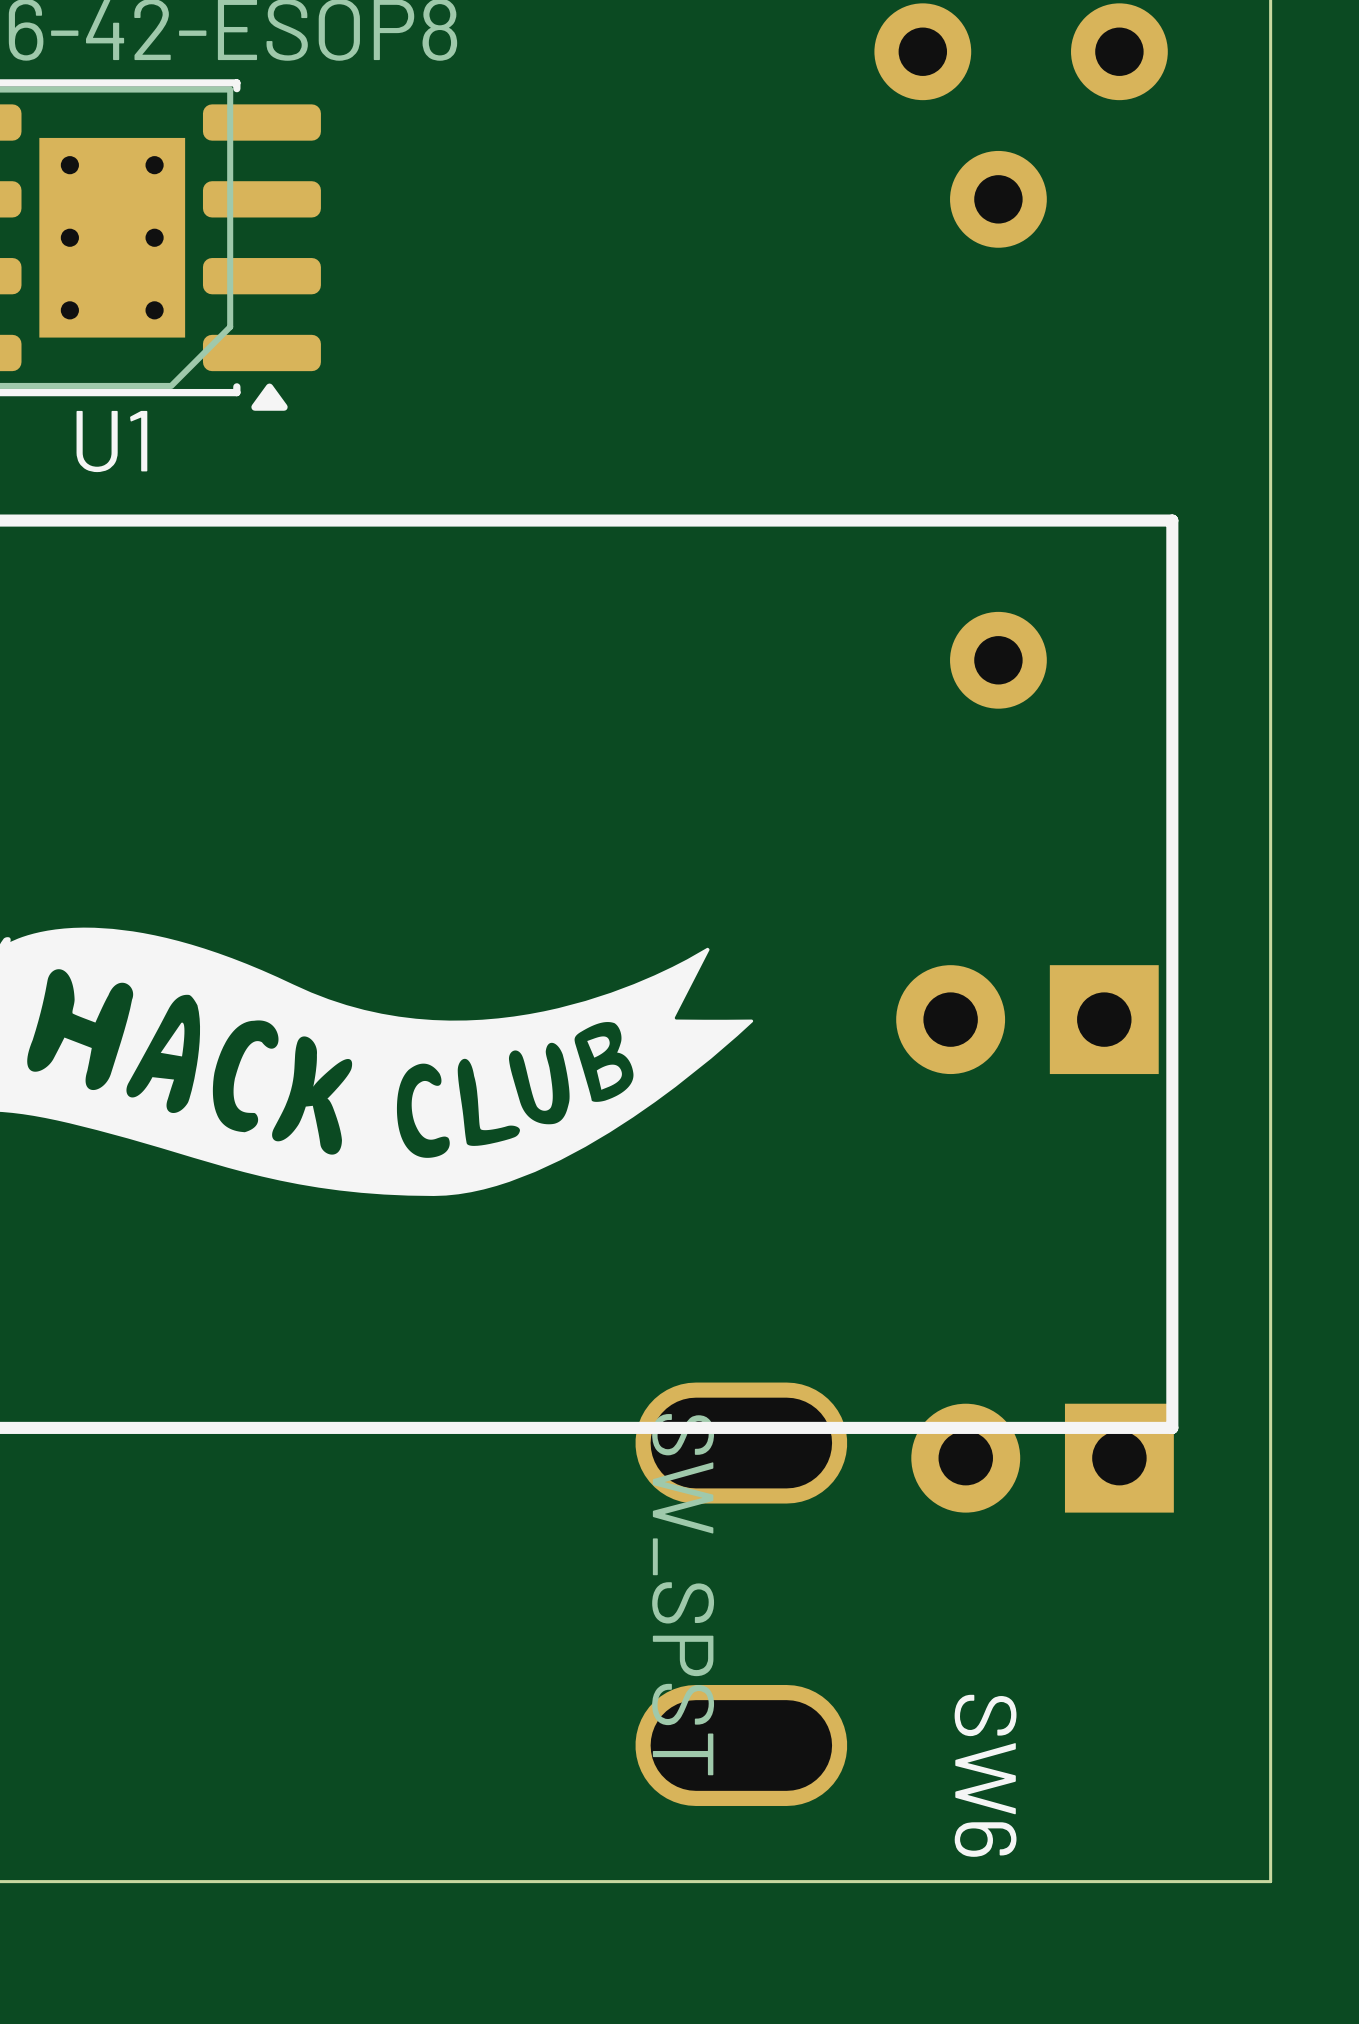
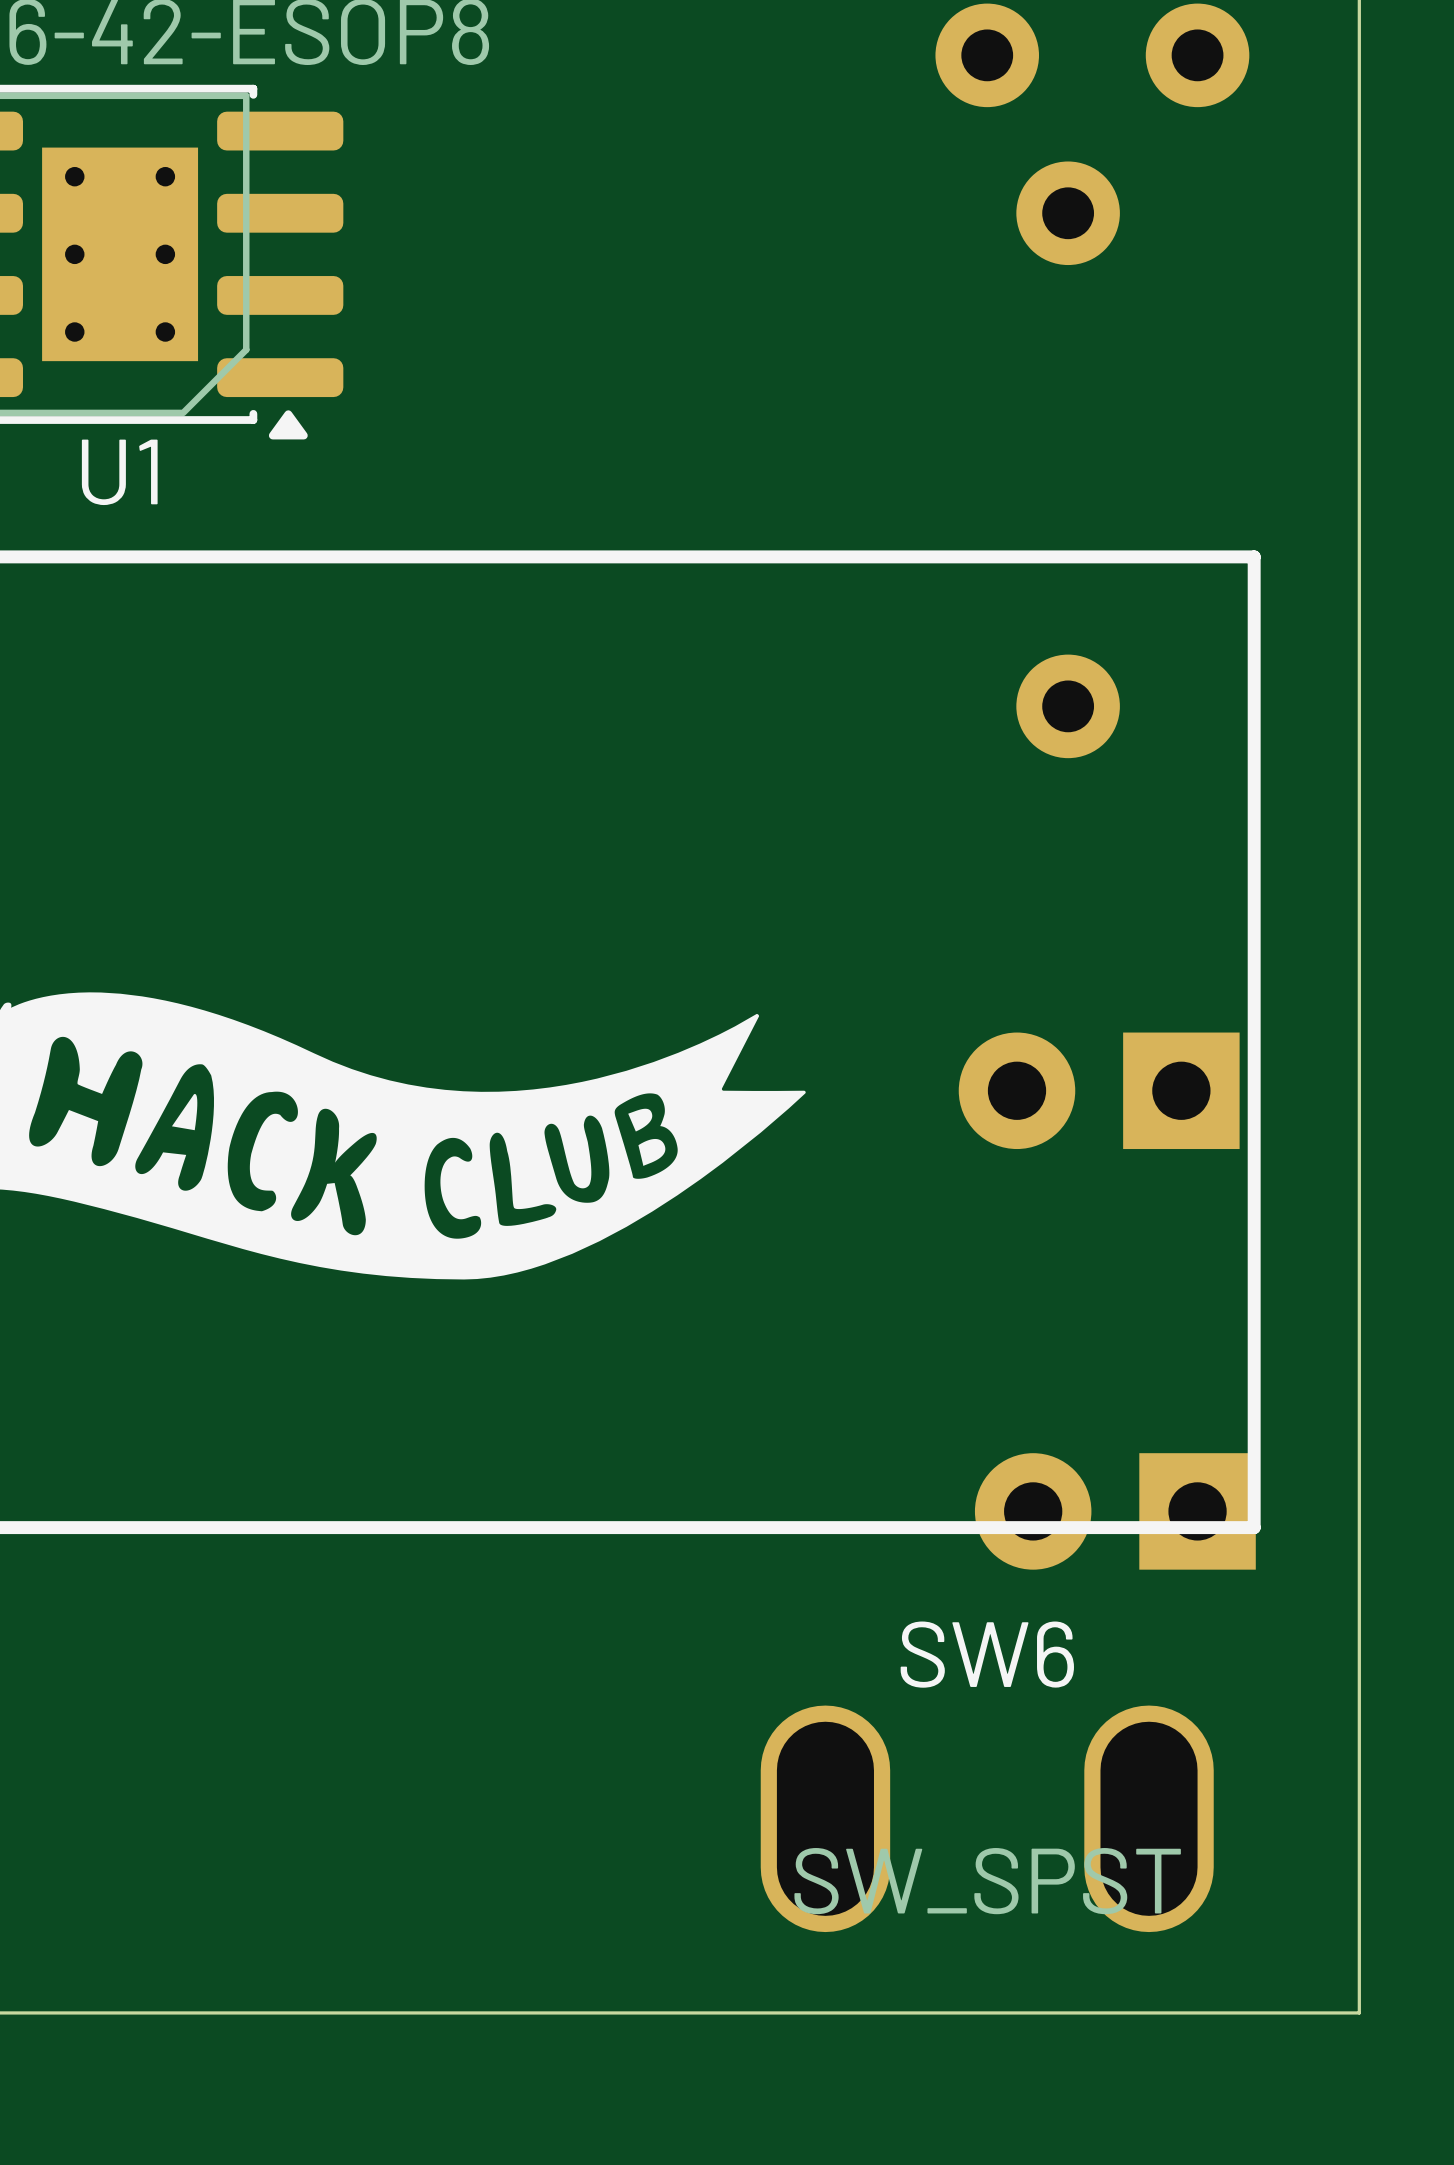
part position: (1042, 1458) -> (1115, 1511)
SW6 rotation: 0° (741, 1594) -> 90° clockwise (987, 1818)
SW6 name position: SW6 (985, 1775) -> SW6 (987, 1654)

